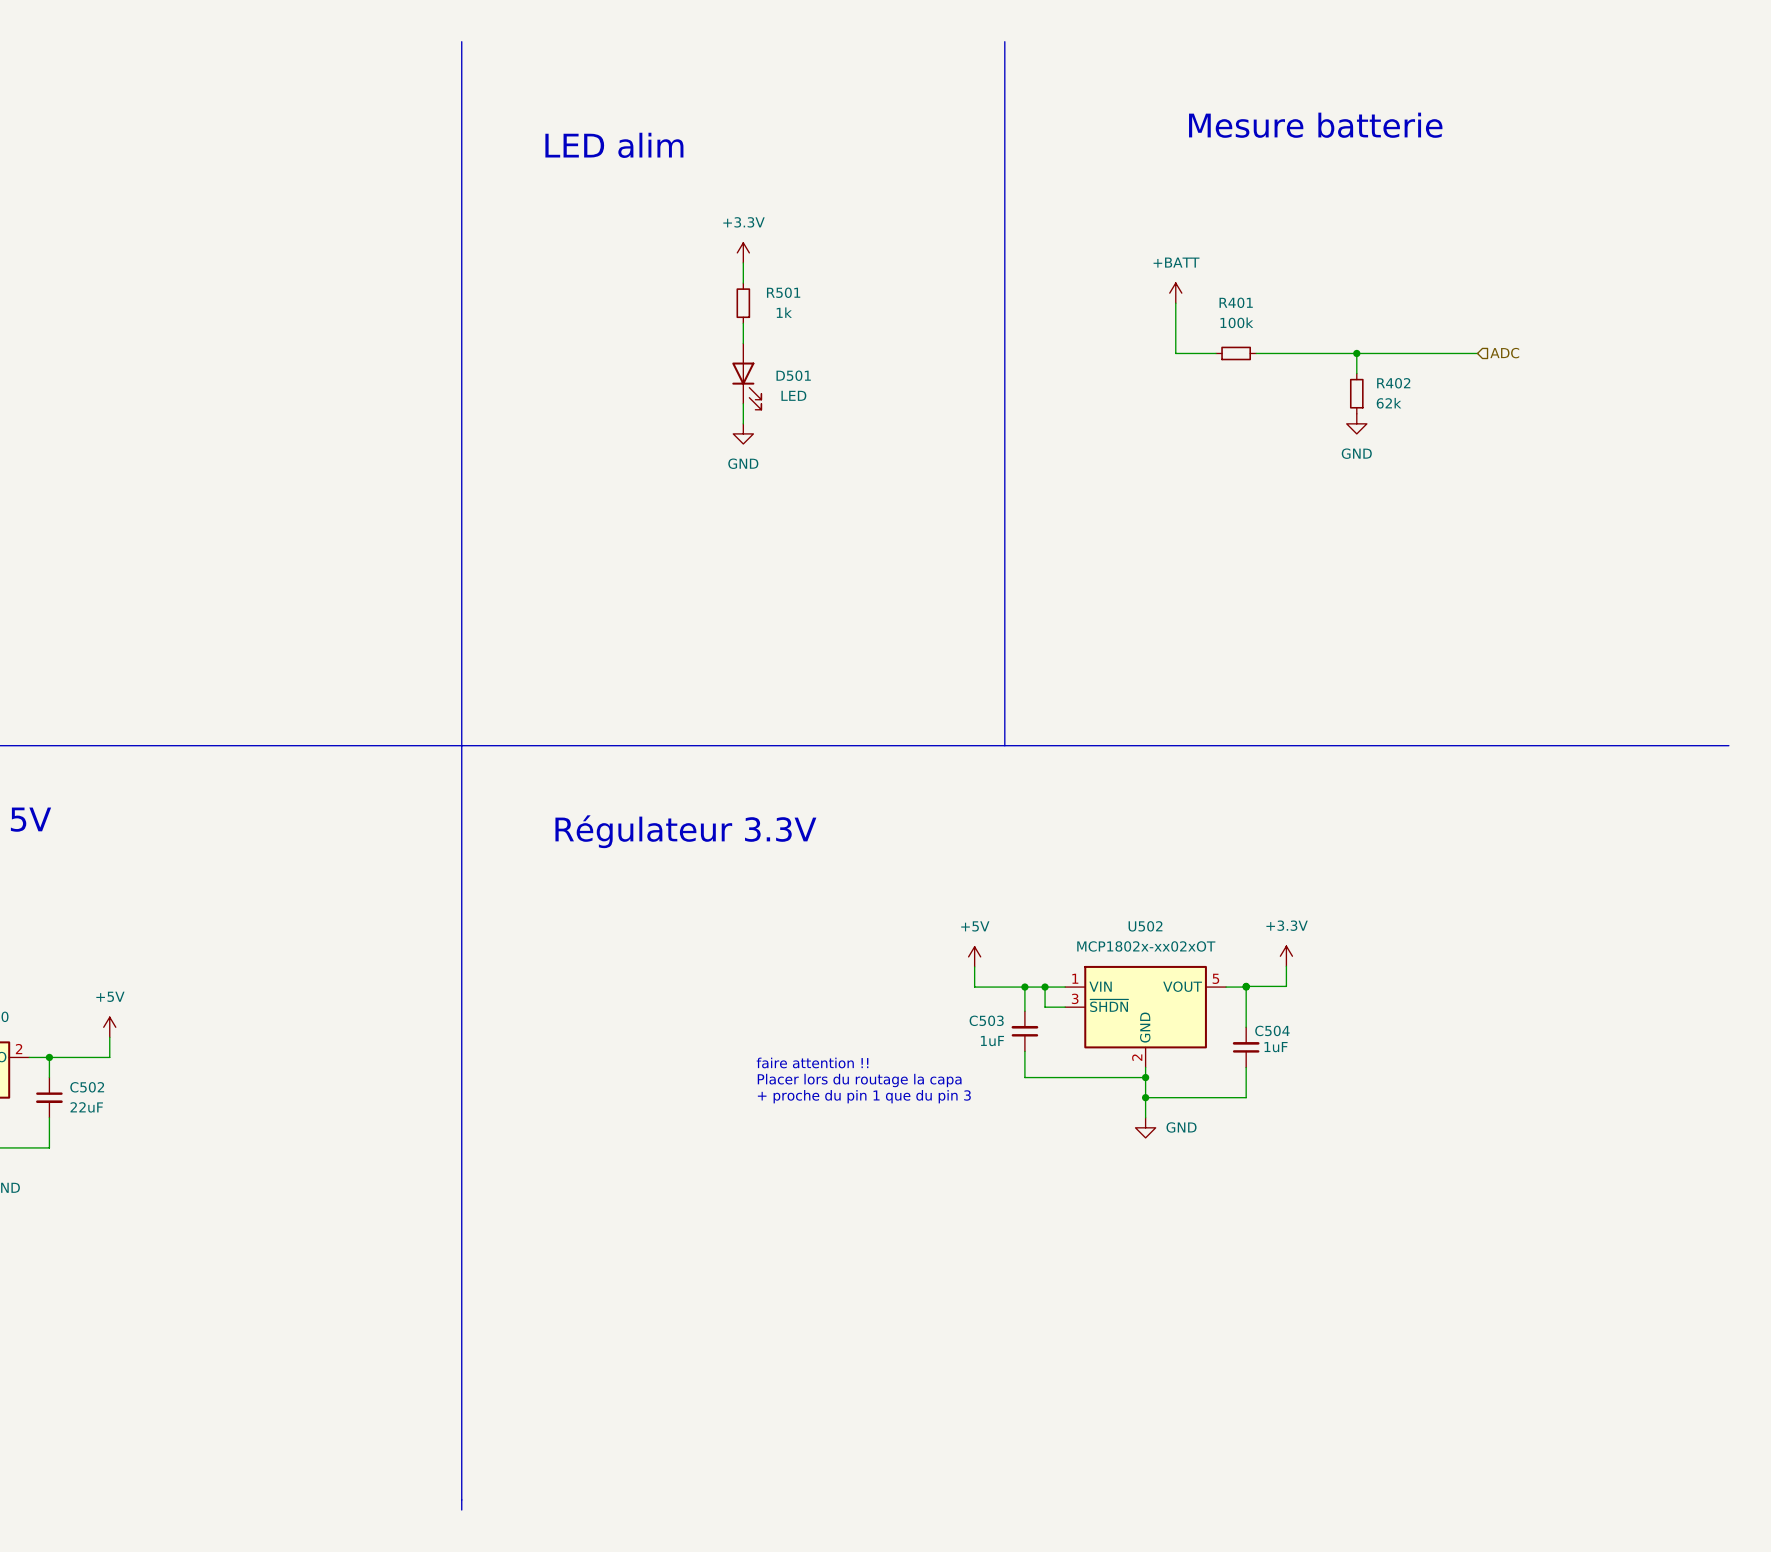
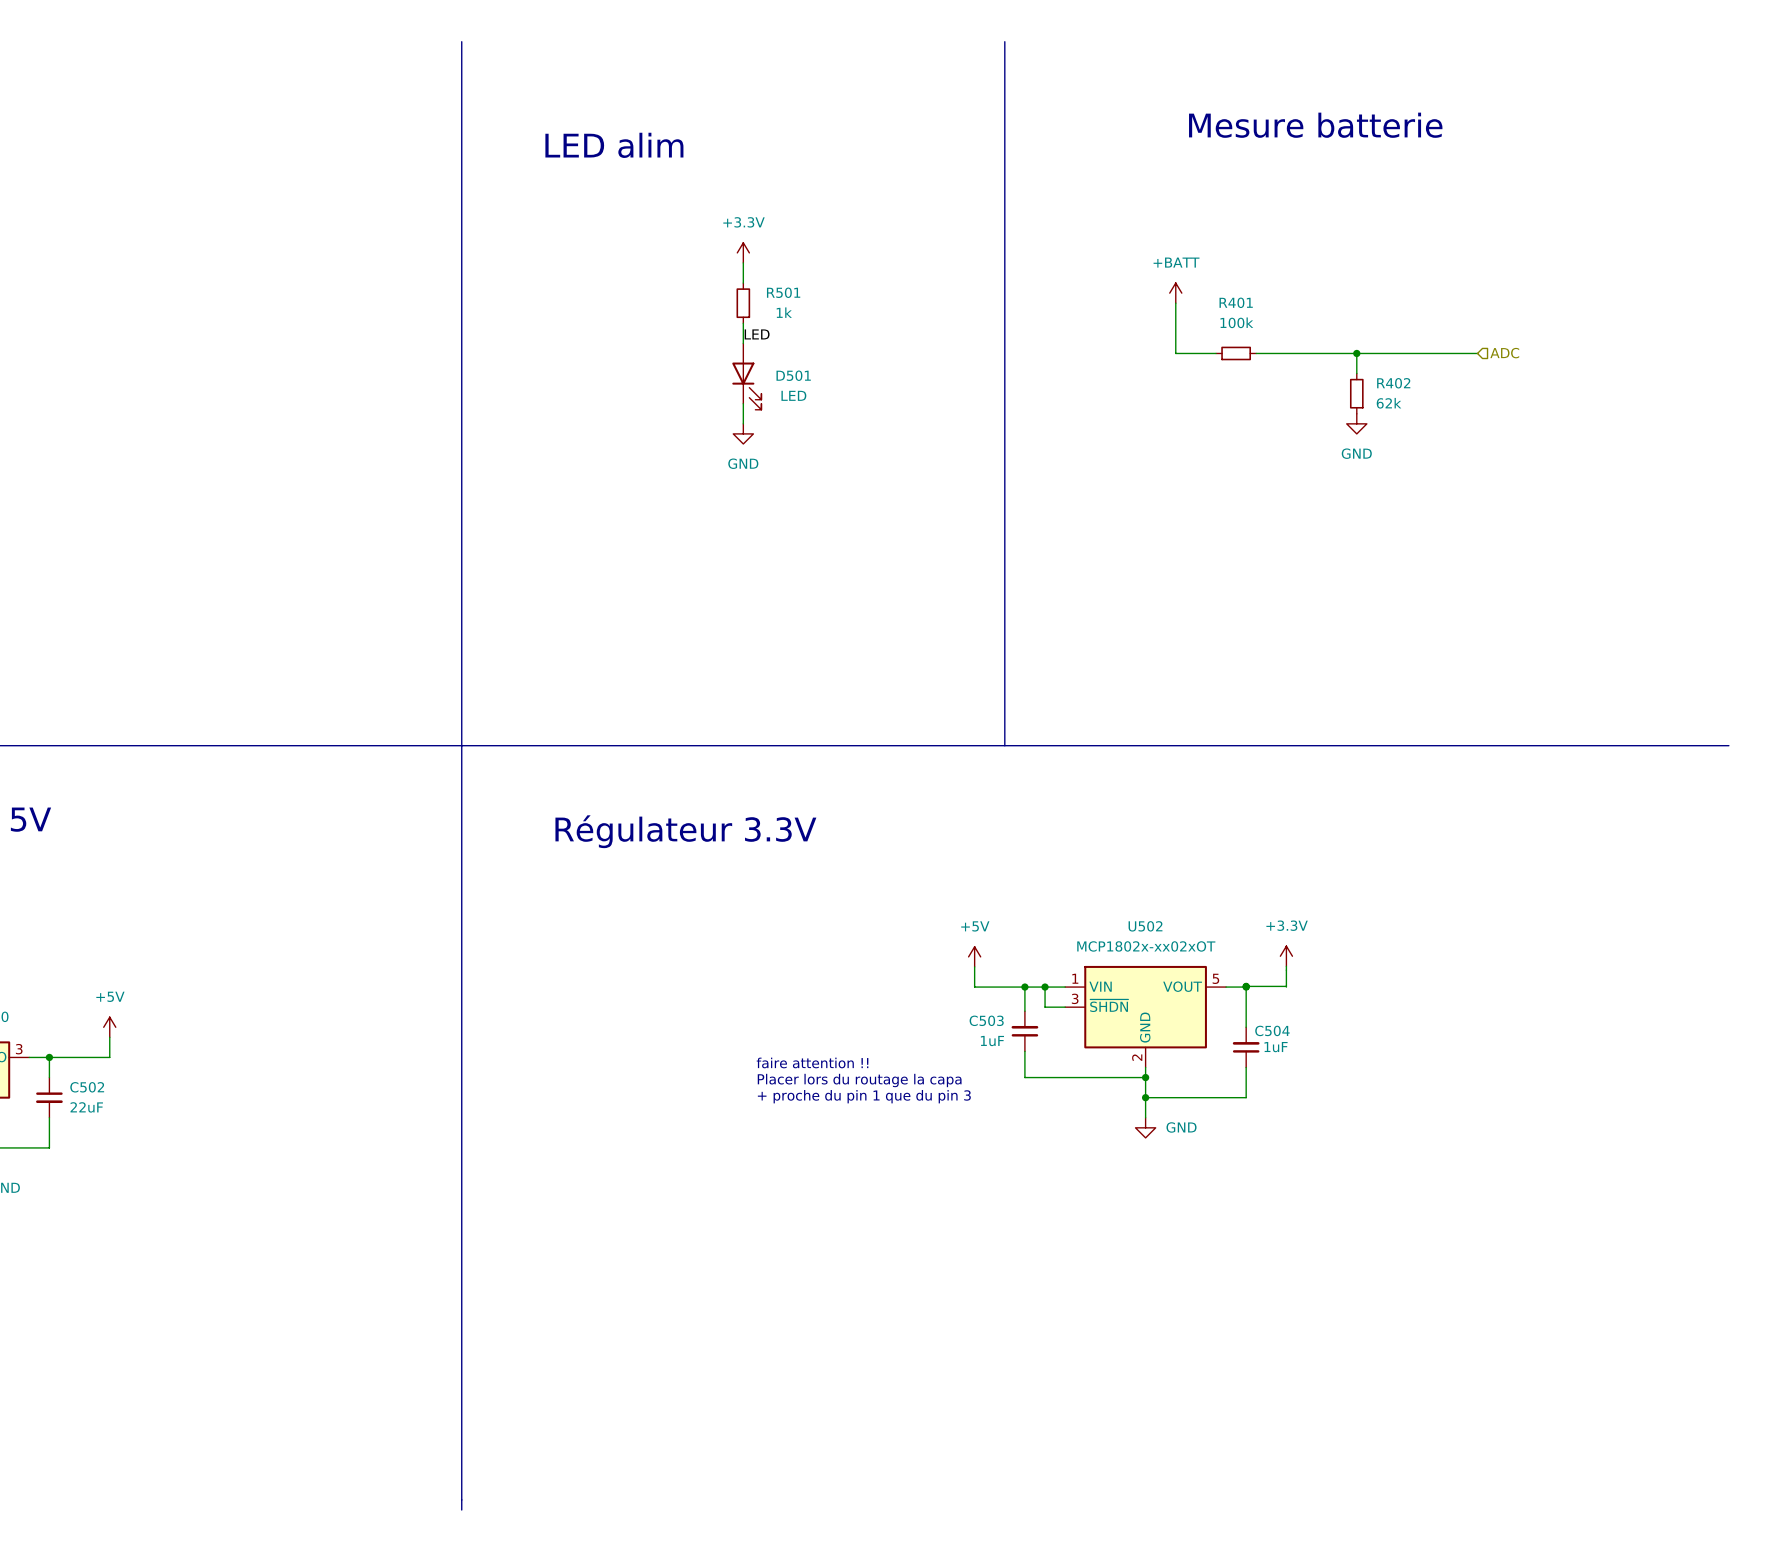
label: none -> LED (757, 334)
part pin number: 2 (19, 1049) -> 3 (19, 1049)

